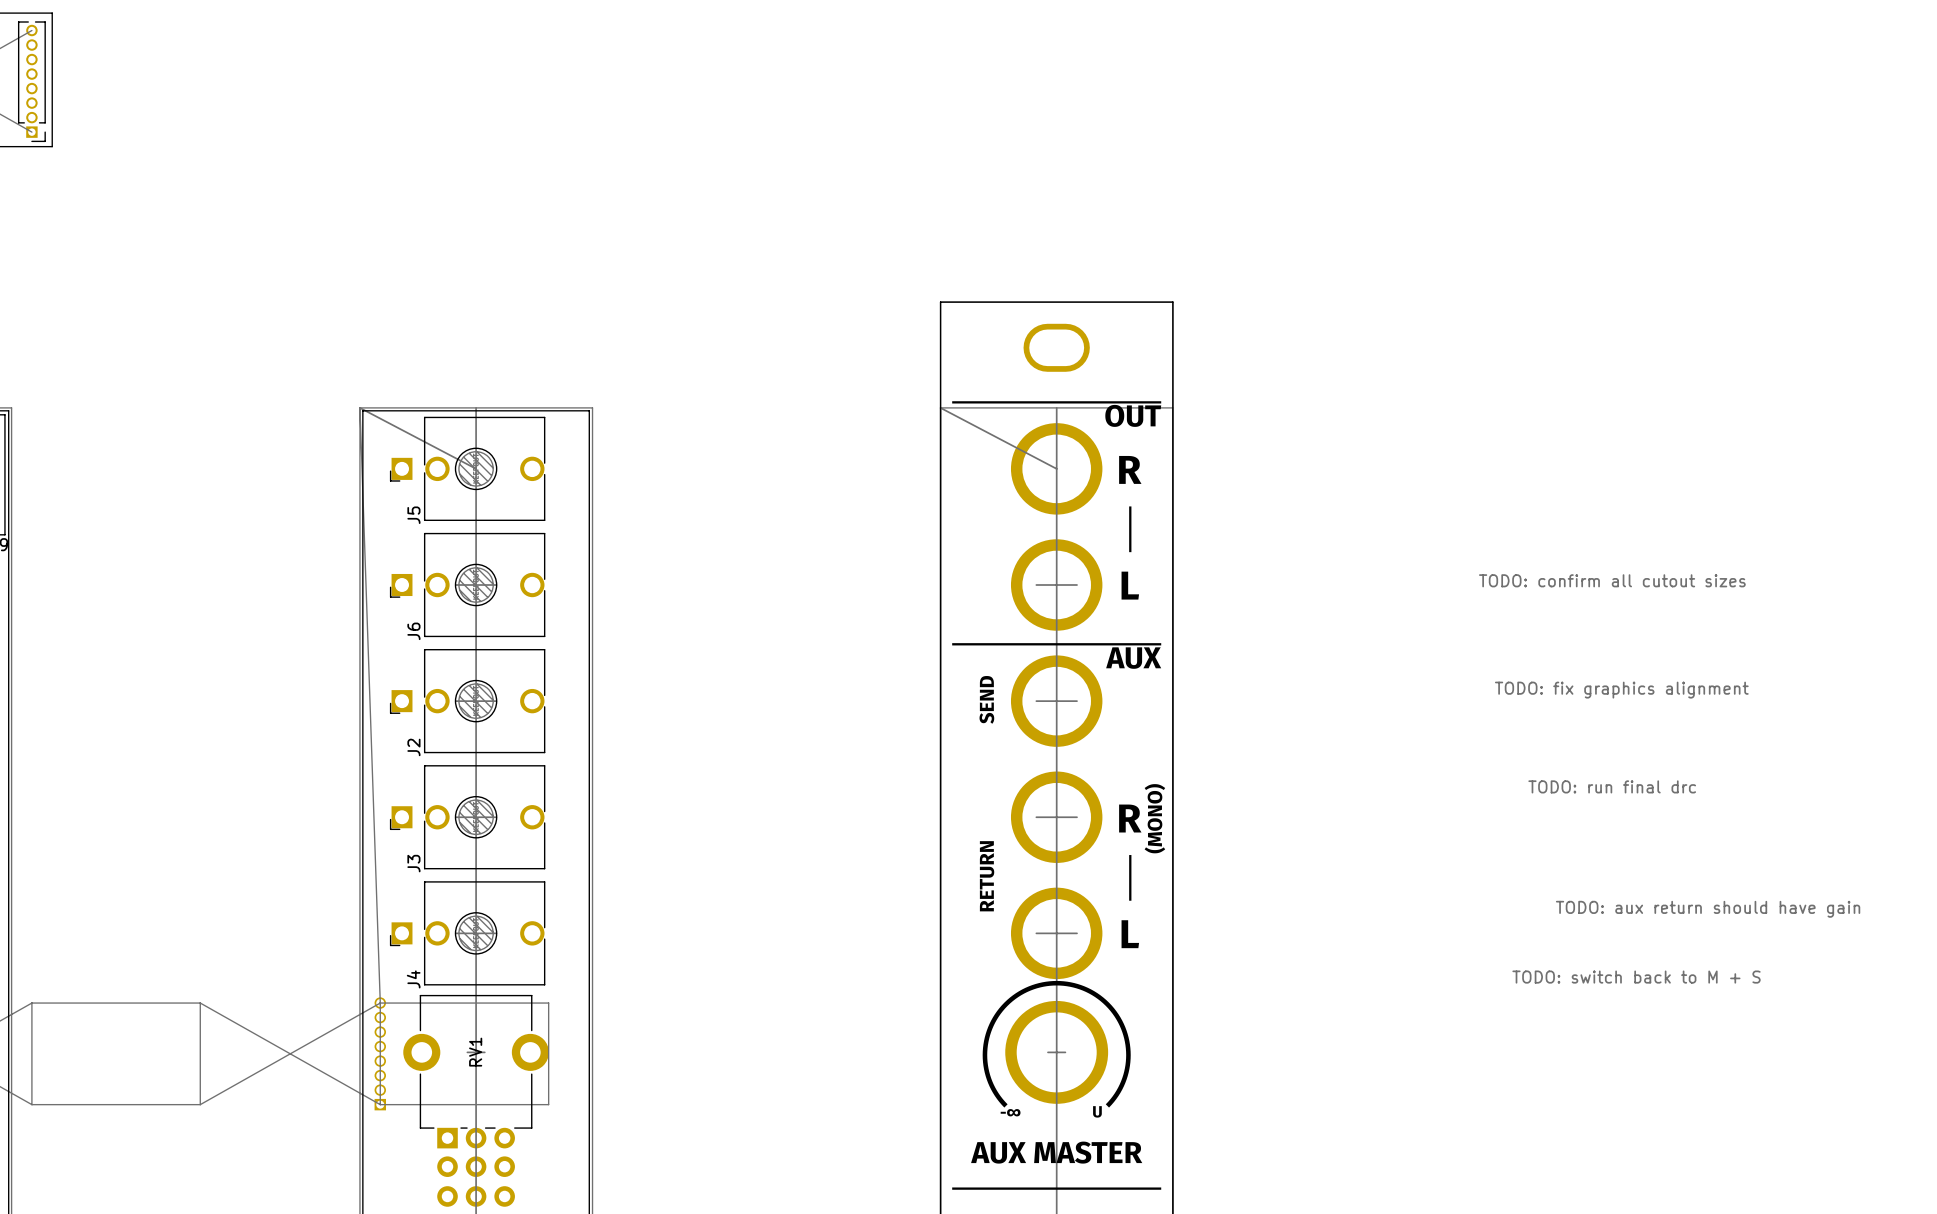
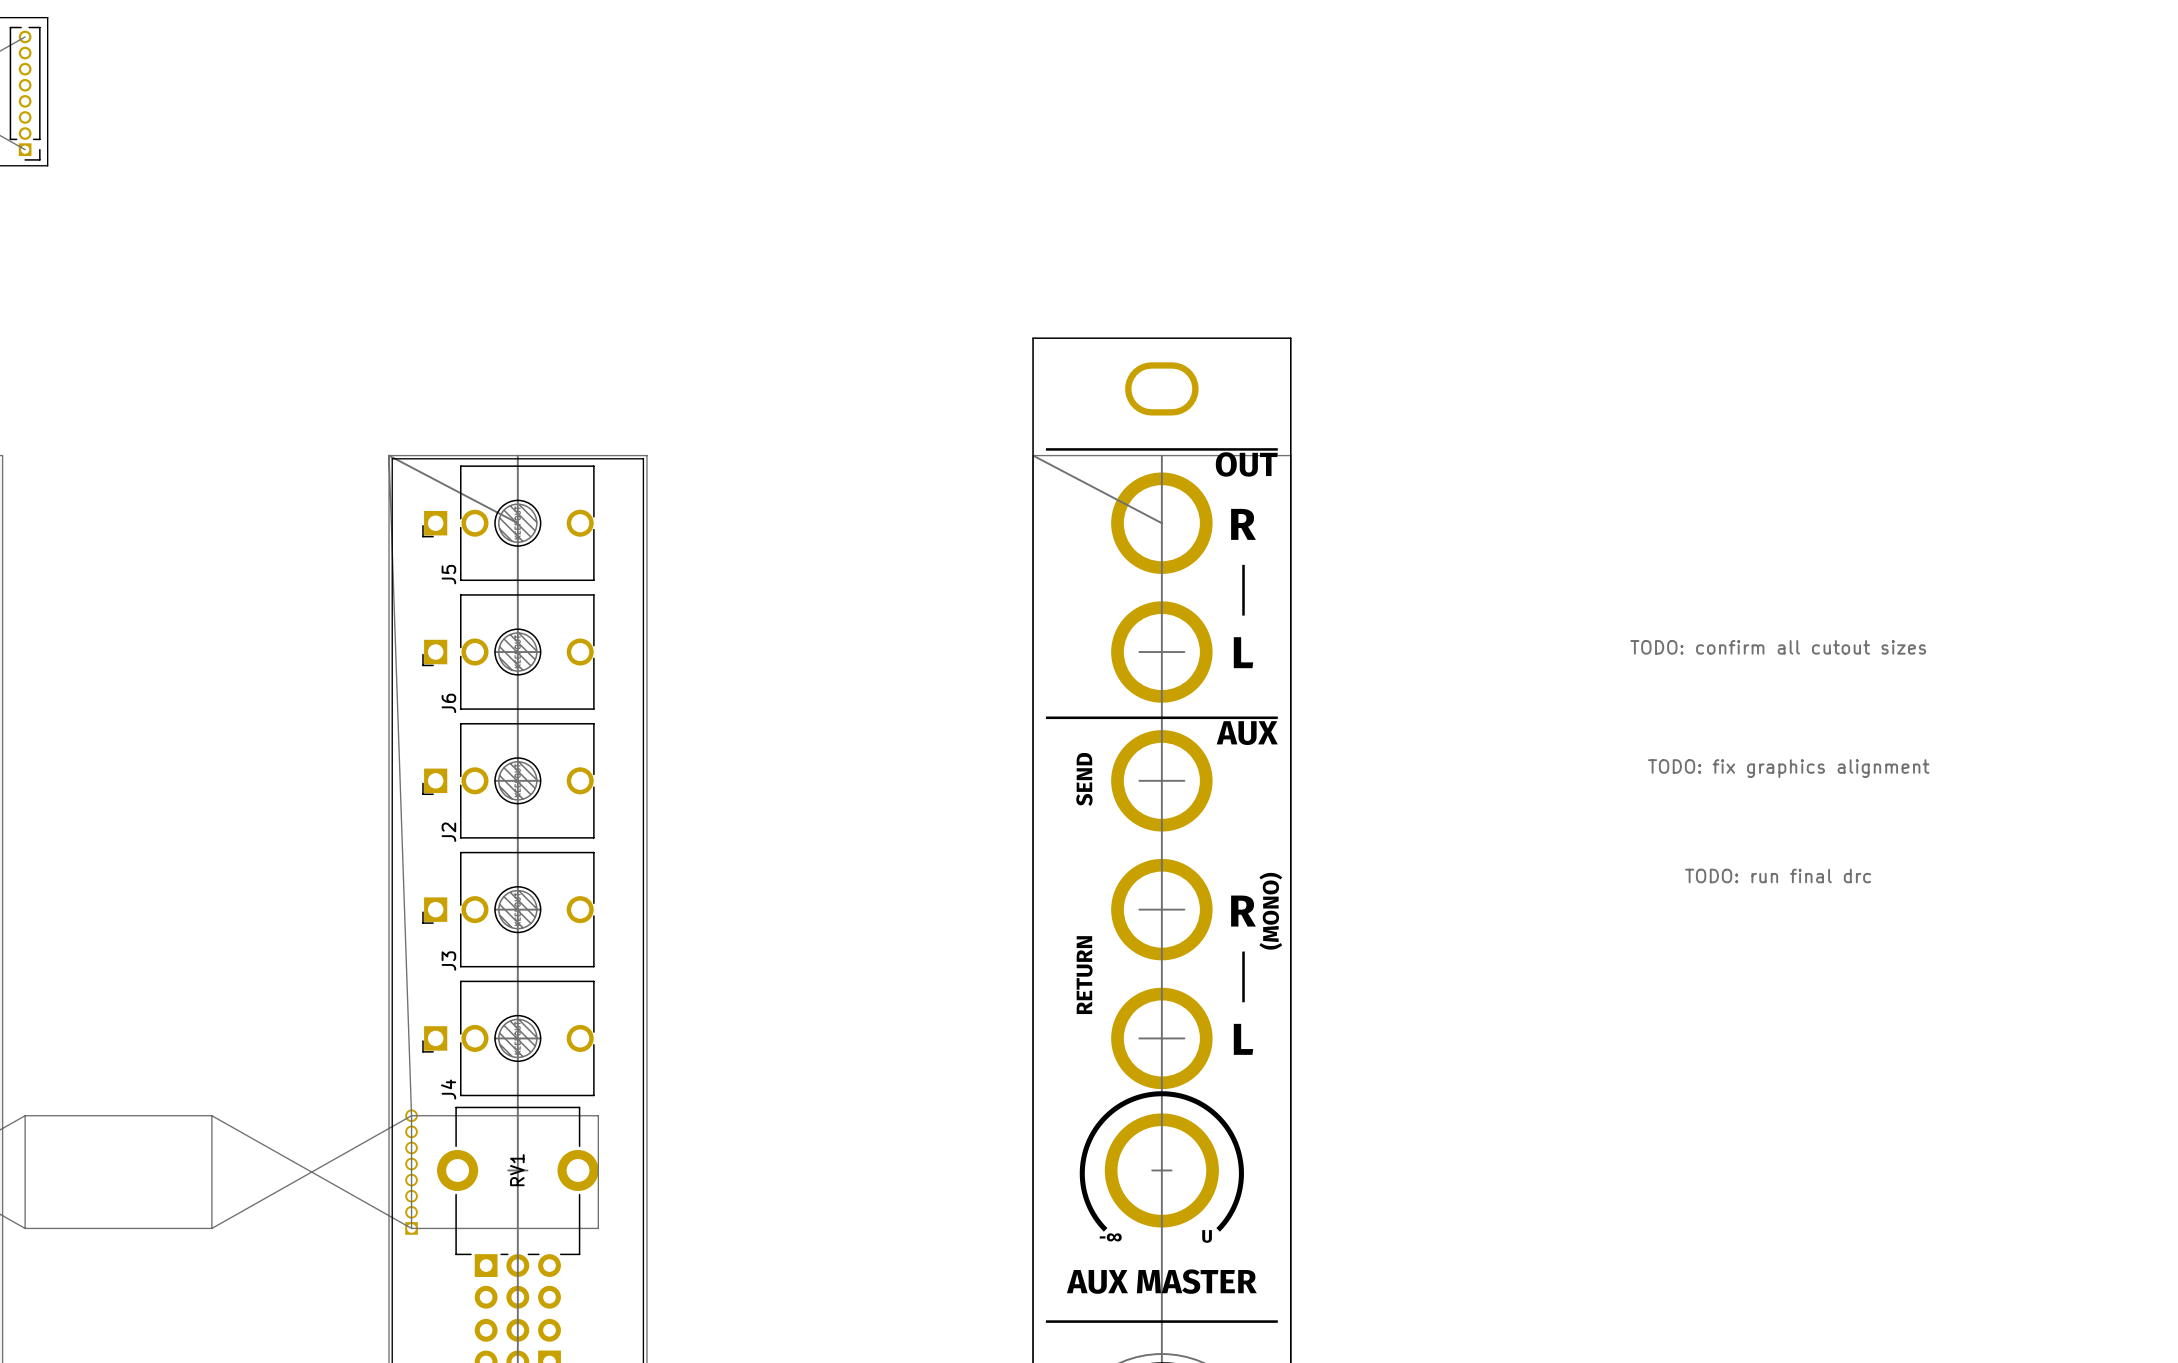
text: TODO: aux return should have gain (1708, 909) -> none
text: TODO: switch back to M + S (1636, 977) -> none

